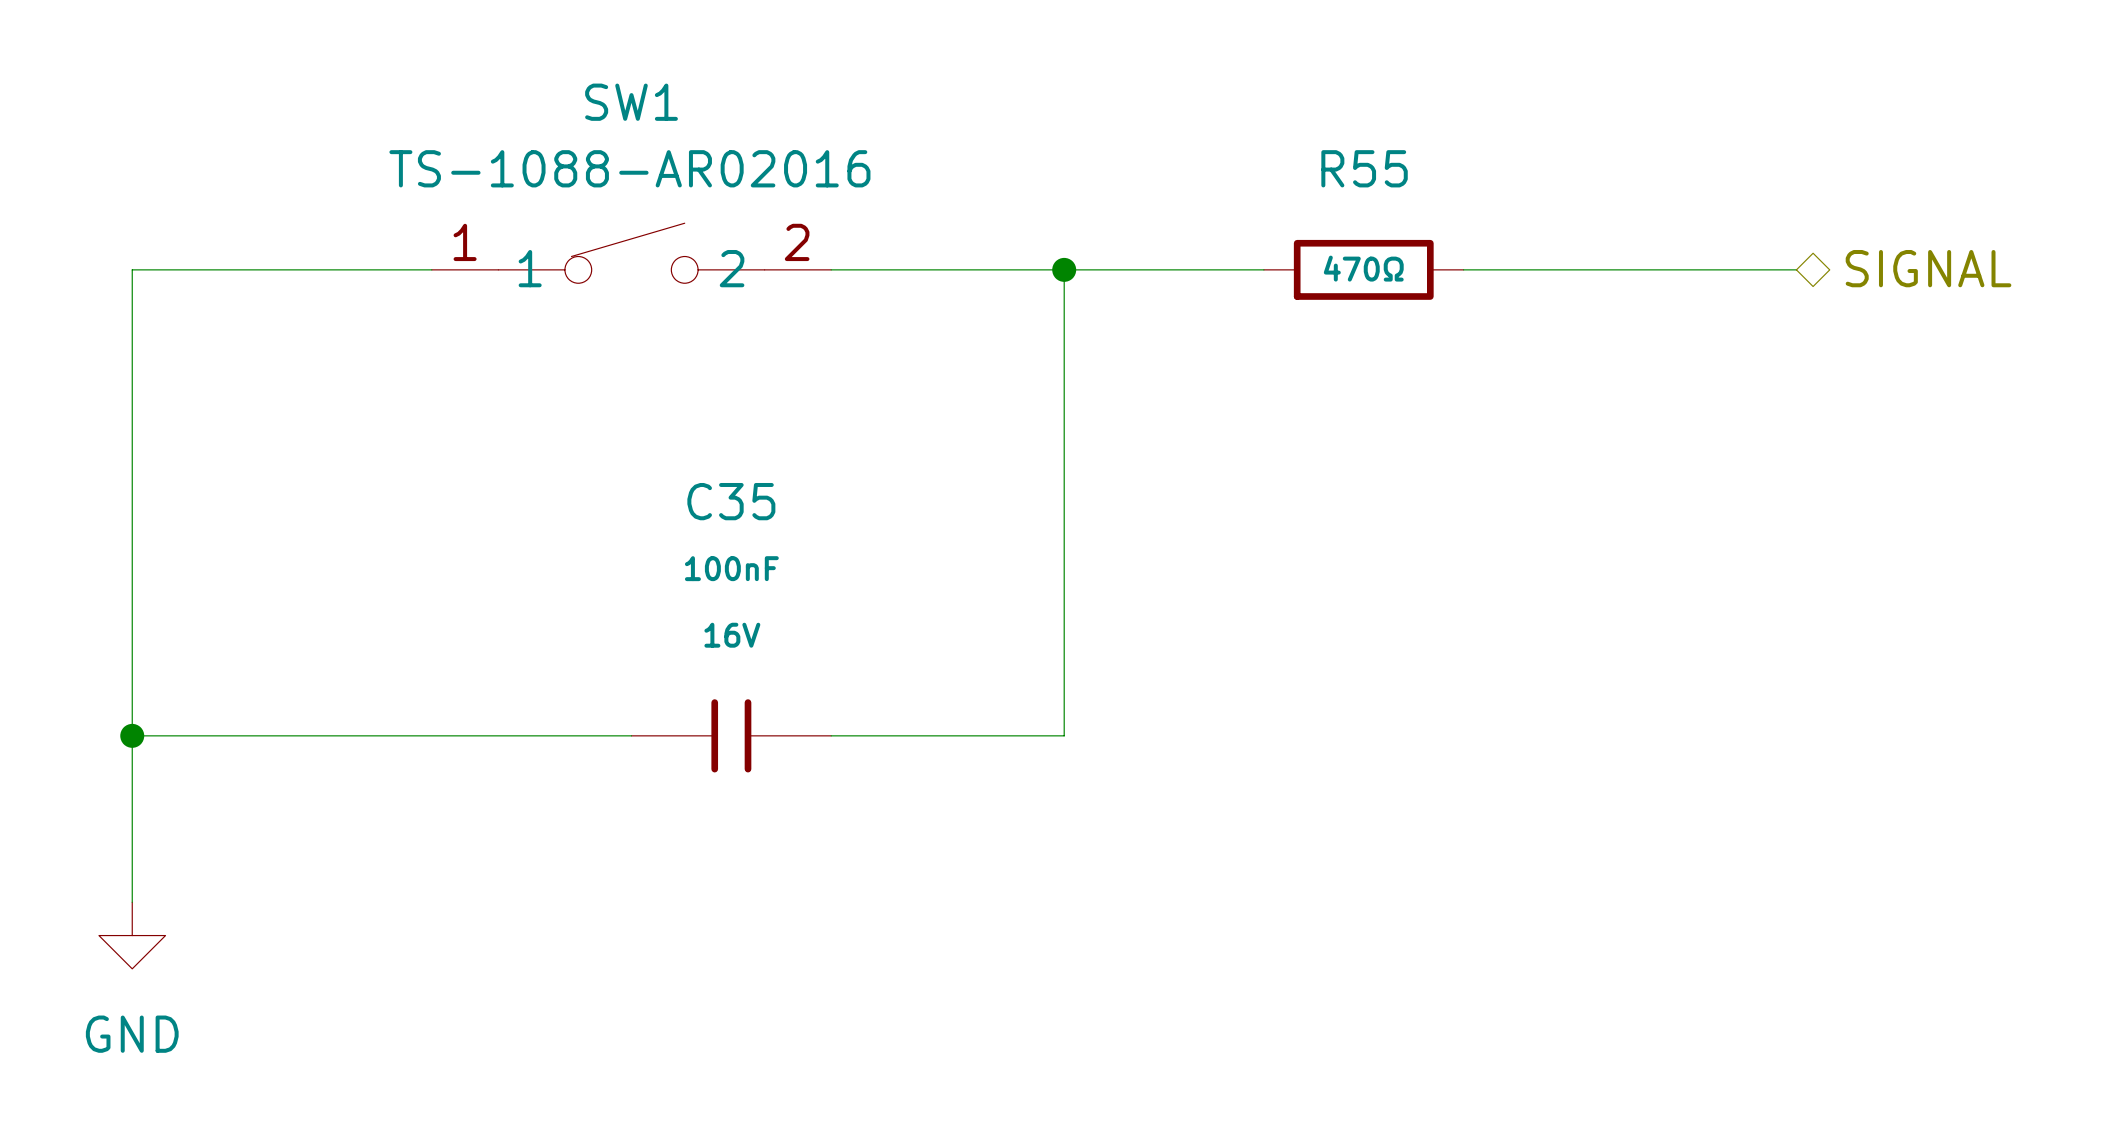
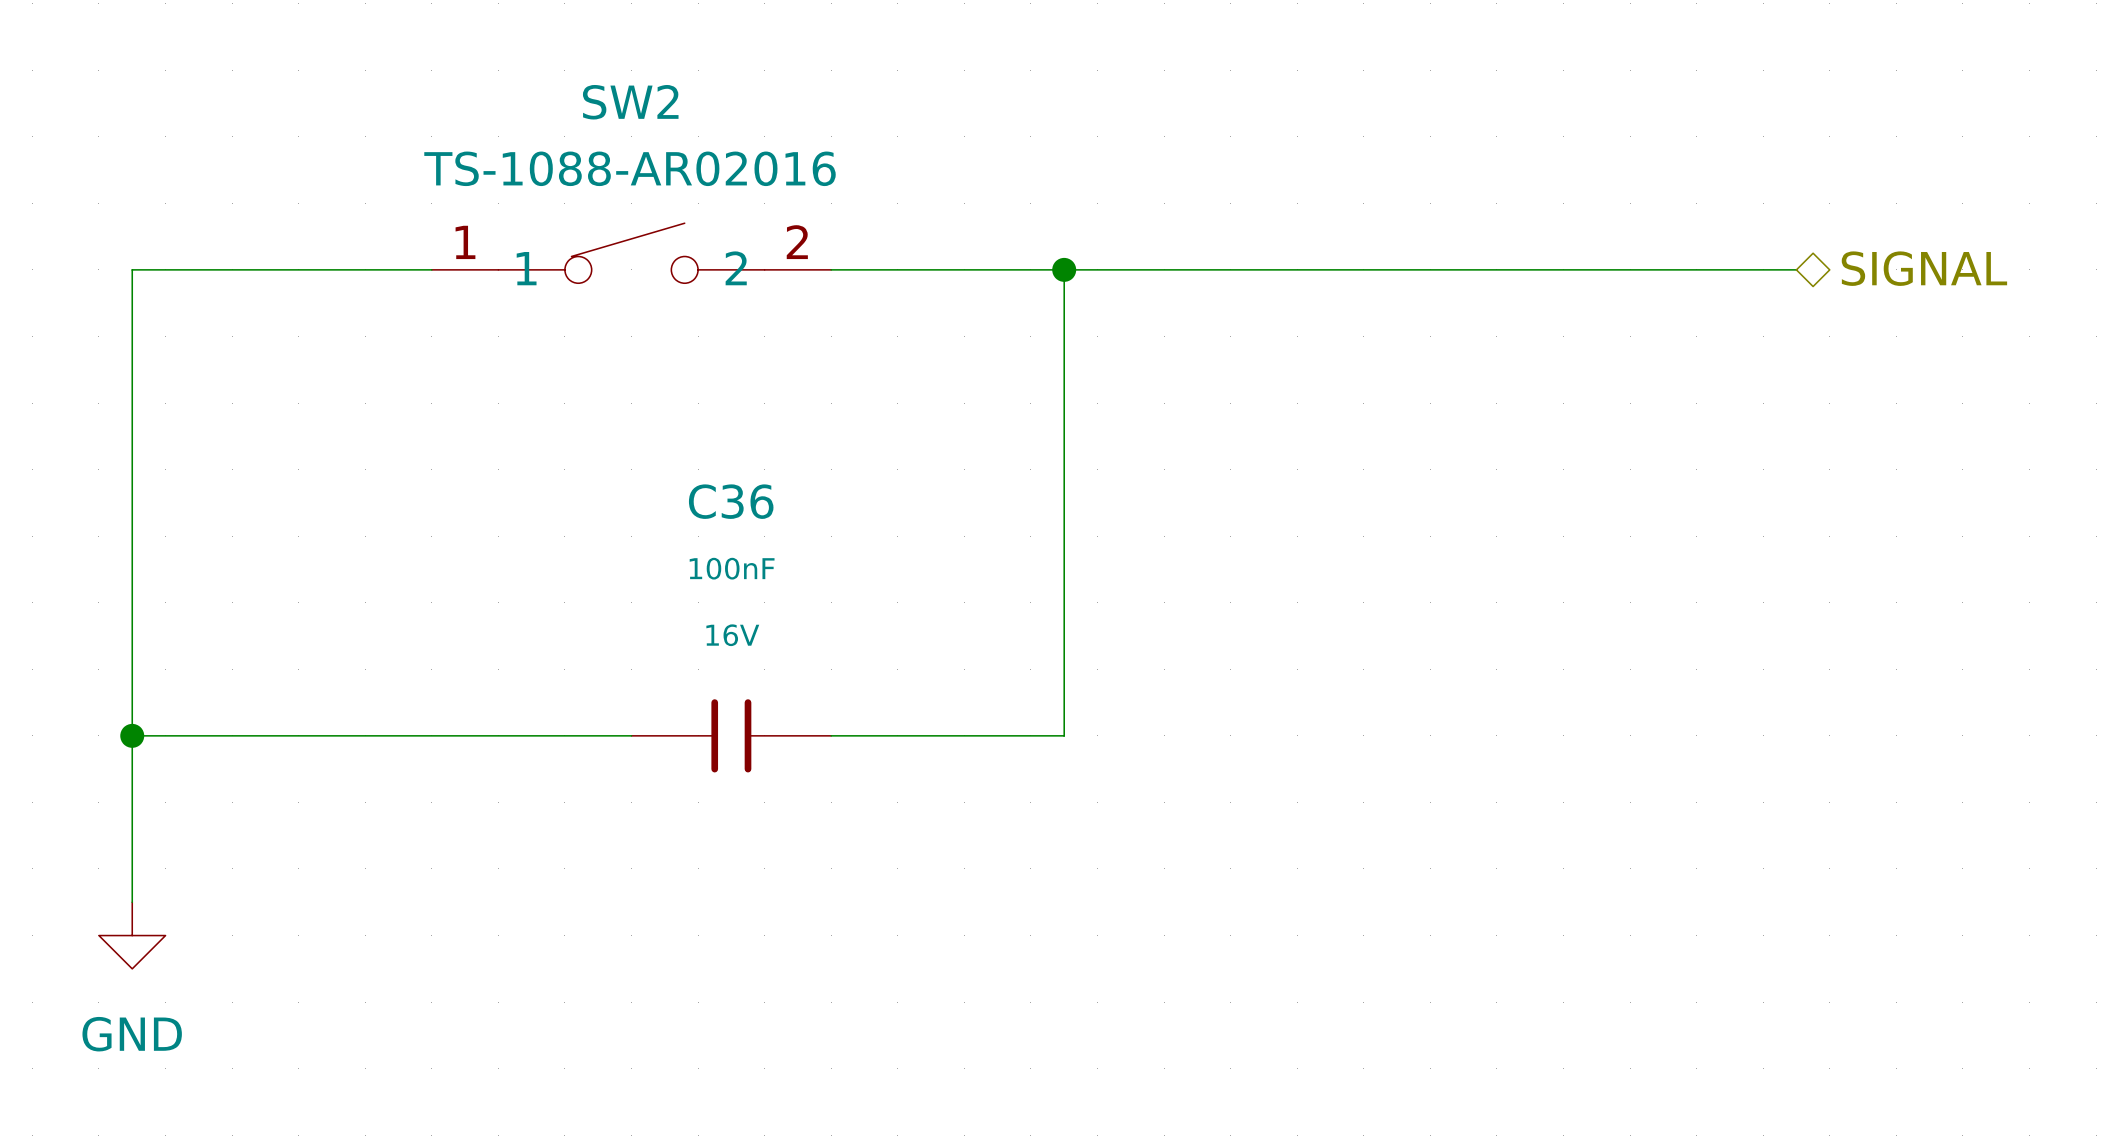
SW1 name: SW1 (631, 102) -> SW2 (630, 102)
wire: none -> (1263, 269) (1463, 269)
R55: 470Ω (1363, 269) -> none
C35 name: C35 (731, 501) -> C36 (731, 501)

